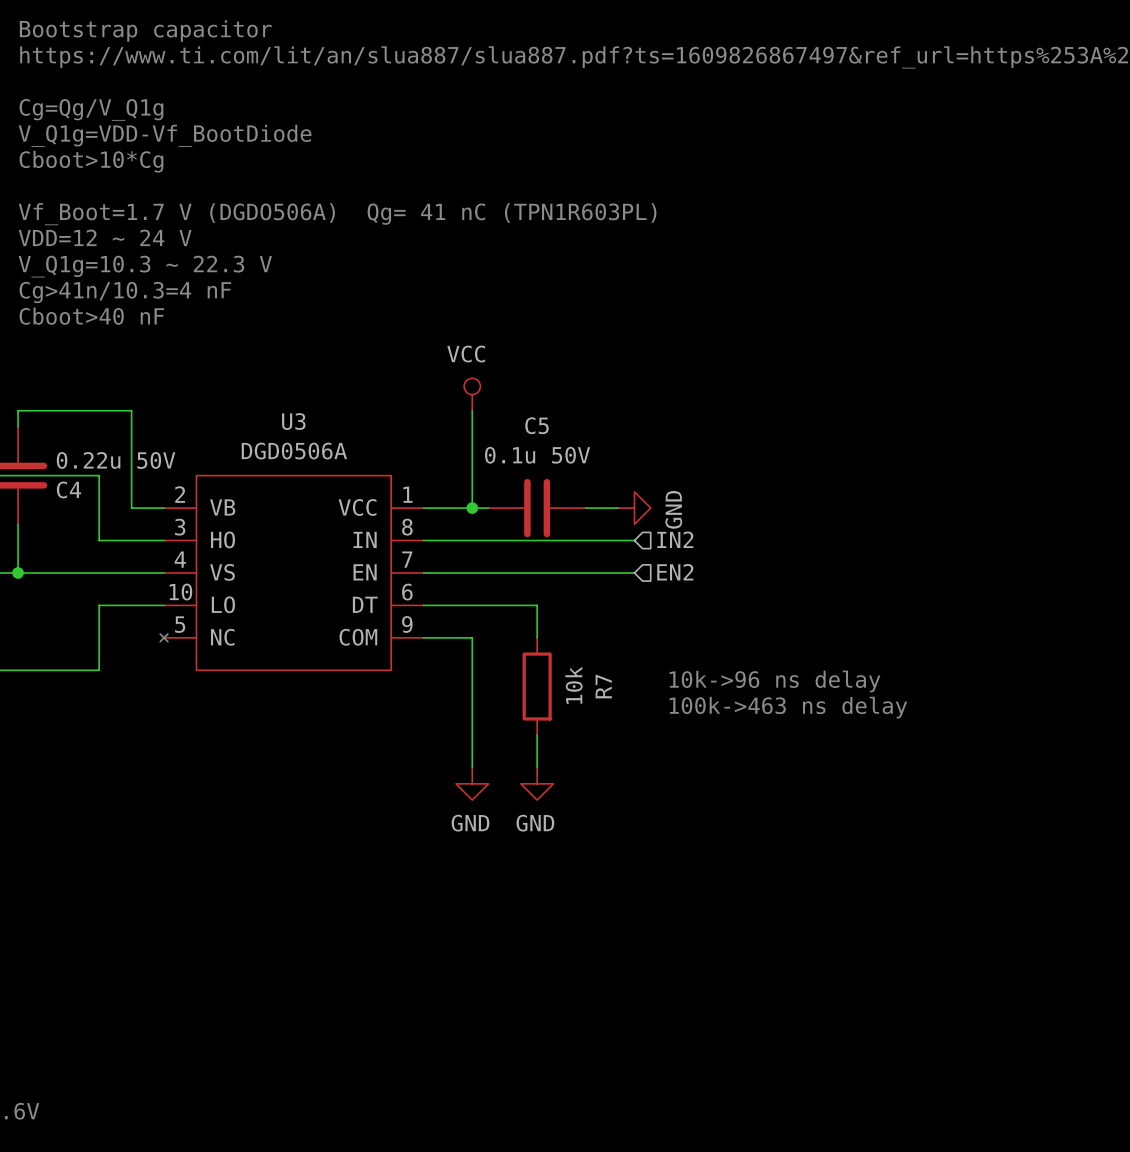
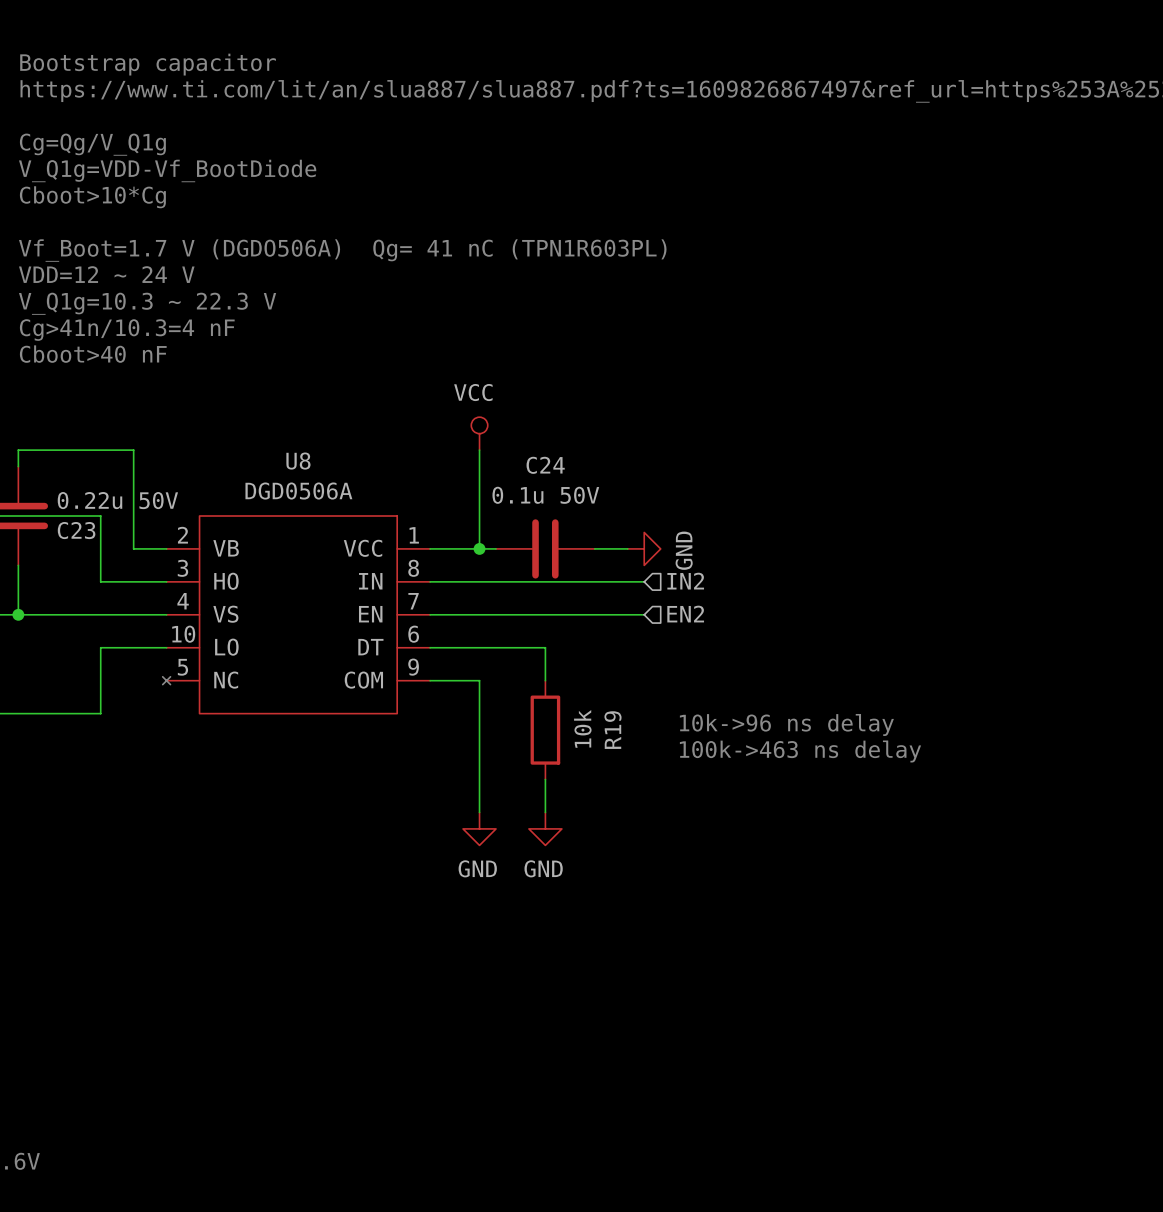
U3 name: U3 (293, 421) -> U8 (298, 461)
C5 name: C5 (537, 425) -> C24 (545, 465)
C4 name: C4 (68, 489) -> C23 (76, 530)
R7 name: R7 (603, 686) -> R19 (612, 730)

